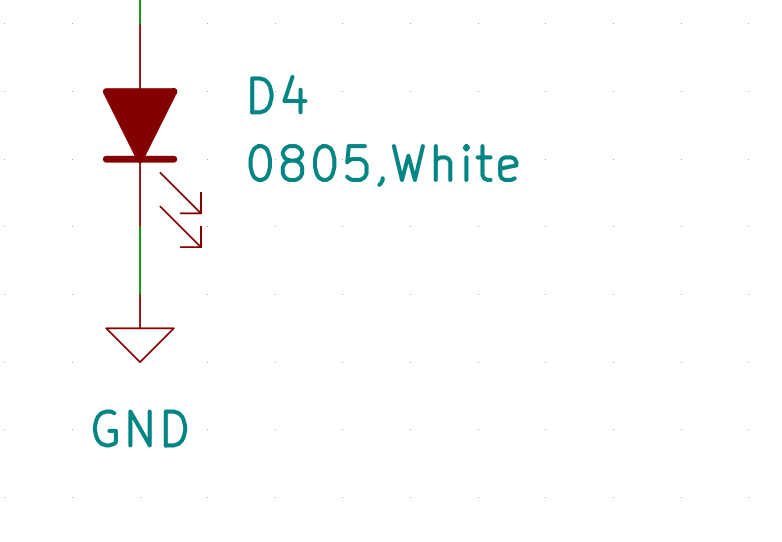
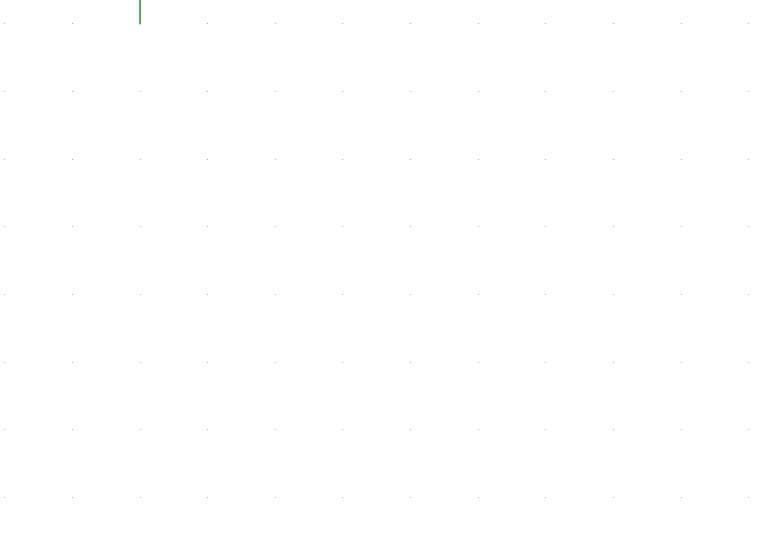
D4: 0805,White (151, 135) -> none
wire: (140, 226) (140, 294) -> none
power symbol: GND (140, 328) -> none

